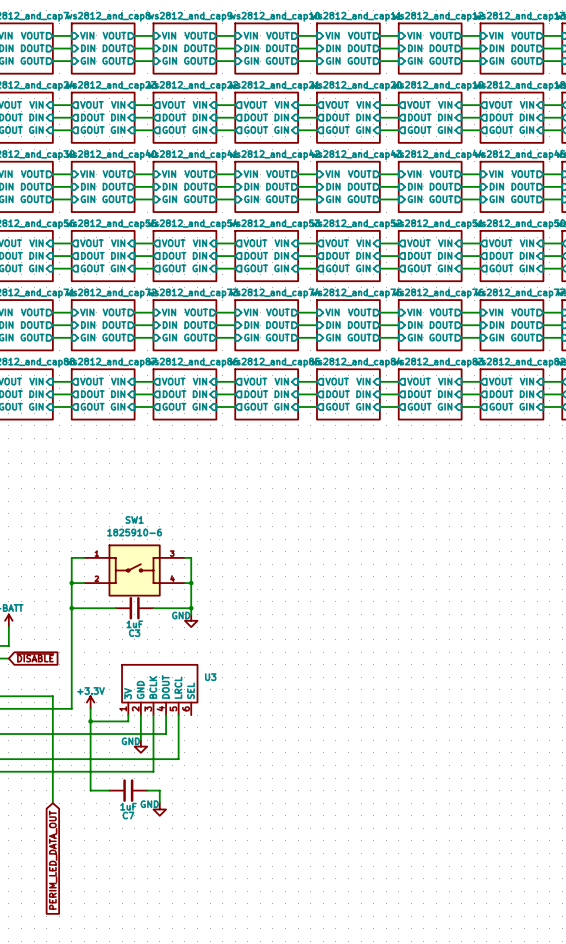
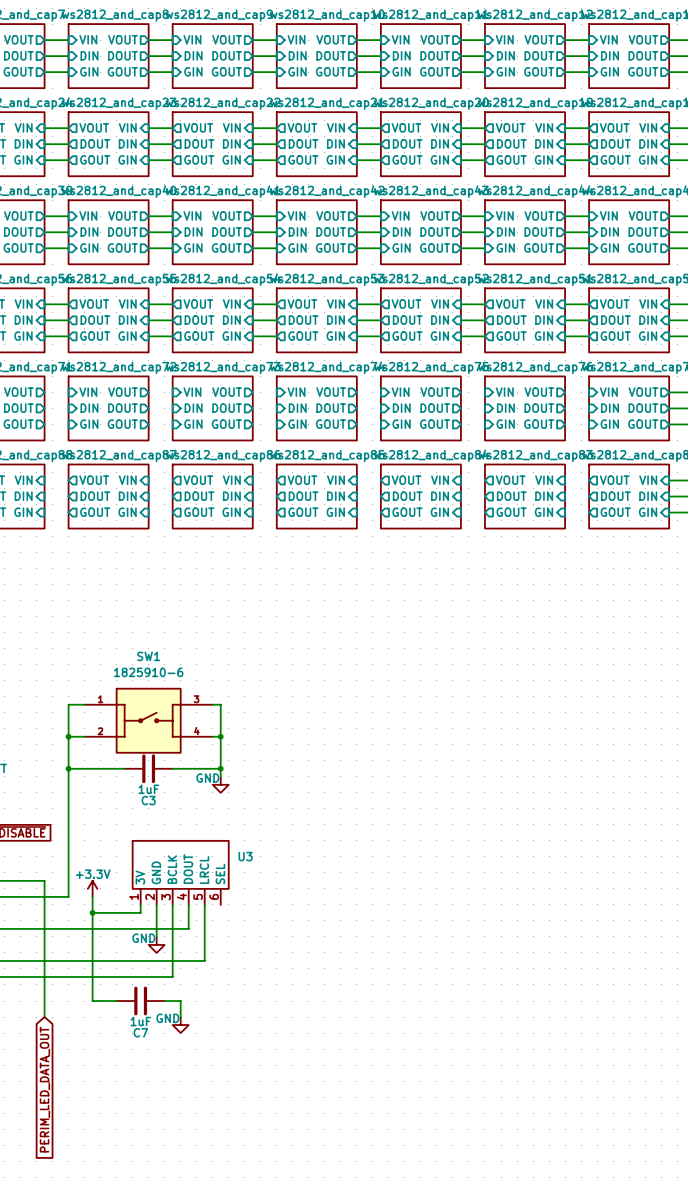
wire: (52, 312) (71, 312) -> none
wire: (134, 312) (153, 312) -> none
wire: (216, 312) (235, 312) -> none
wire: (298, 312) (316, 312) -> none
wire: (379, 312) (398, 312) -> none
wire: (461, 312) (480, 312) -> none
wire: (52, 325) (71, 325) -> none
wire: (134, 325) (153, 325) -> none
wire: (216, 325) (235, 325) -> none
wire: (298, 325) (316, 325) -> none
wire: (379, 325) (398, 325) -> none
wire: (461, 325) (480, 325) -> none
wire: (52, 337) (71, 337) -> none
wire: (134, 337) (153, 337) -> none
wire: (216, 337) (235, 337) -> none
wire: (298, 337) (316, 337) -> none
wire: (379, 337) (398, 337) -> none
wire: (461, 337) (480, 337) -> none
wire: (52, 381) (71, 381) -> none
wire: (134, 381) (153, 381) -> none
wire: (216, 381) (235, 381) -> none
wire: (298, 381) (316, 381) -> none
wire: (379, 381) (398, 381) -> none
wire: (461, 381) (480, 381) -> none
wire: (52, 394) (71, 394) -> none
wire: (134, 394) (153, 394) -> none
wire: (216, 394) (235, 394) -> none
wire: (298, 394) (316, 394) -> none
wire: (379, 394) (398, 394) -> none
wire: (461, 394) (480, 394) -> none
wire: (52, 406) (71, 406) -> none
wire: (134, 406) (153, 406) -> none
wire: (216, 406) (235, 406) -> none
wire: (298, 406) (316, 406) -> none
wire: (379, 406) (398, 406) -> none
wire: (461, 406) (480, 406) -> none

